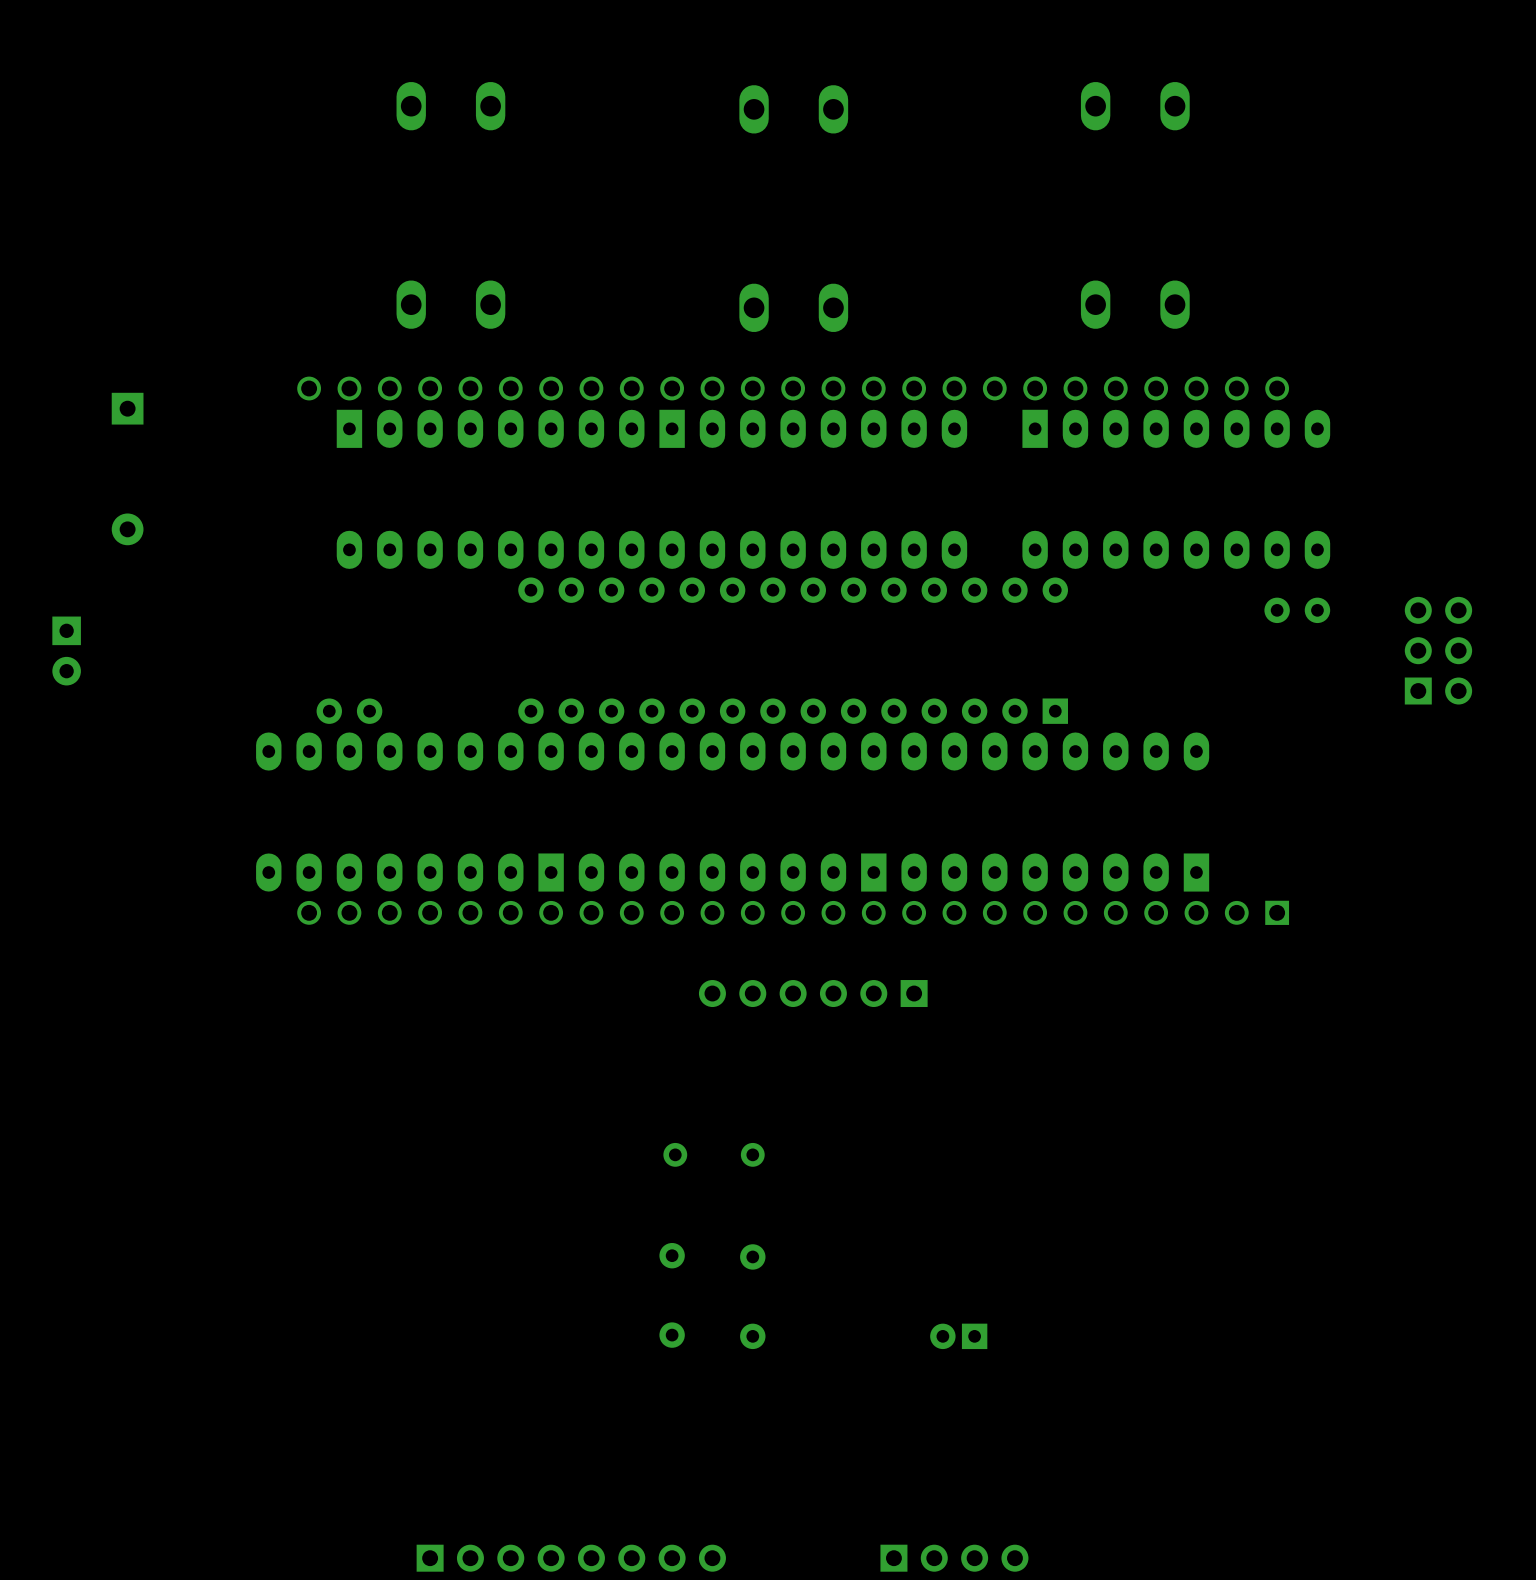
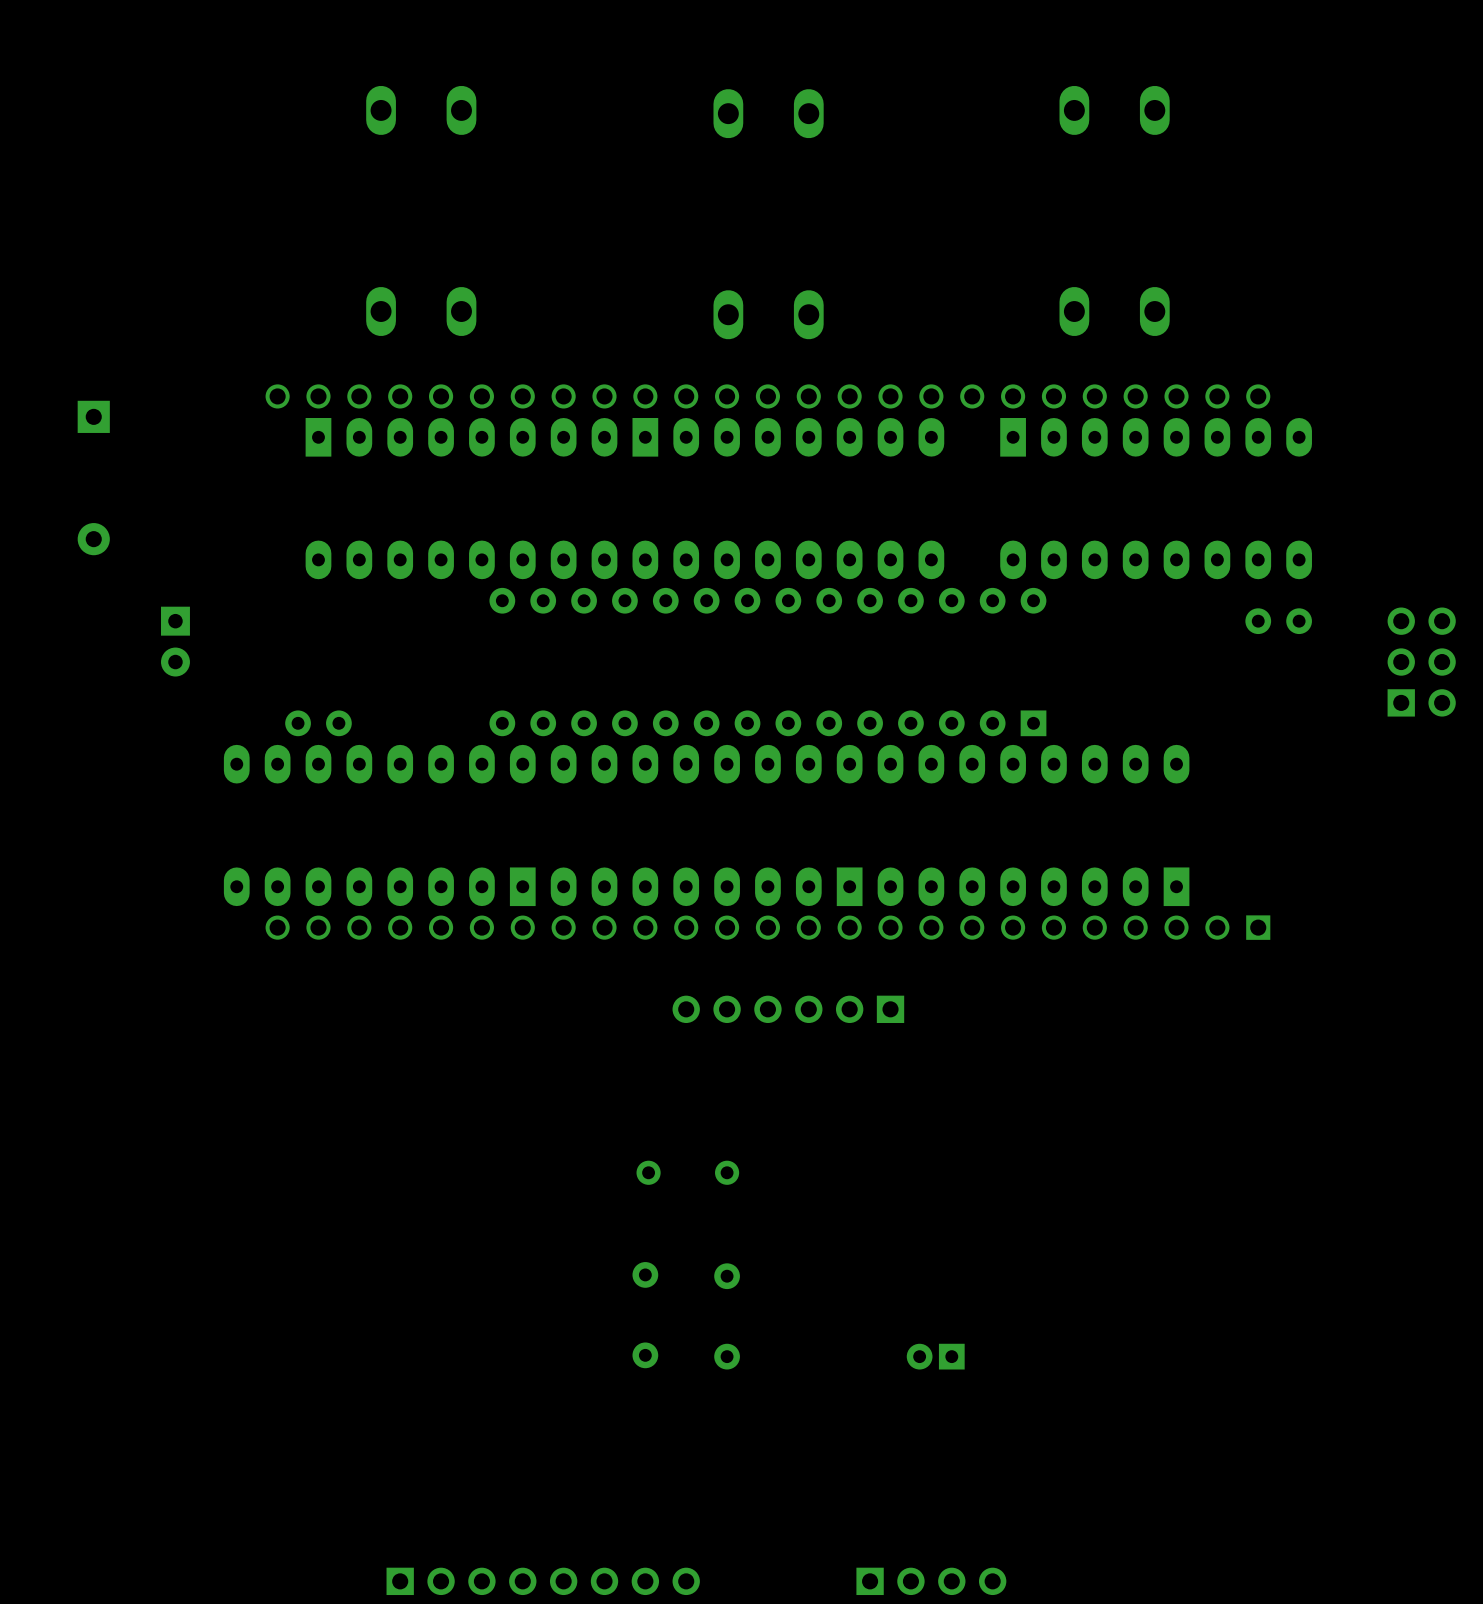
part position: (66, 651) -> (175, 641)

